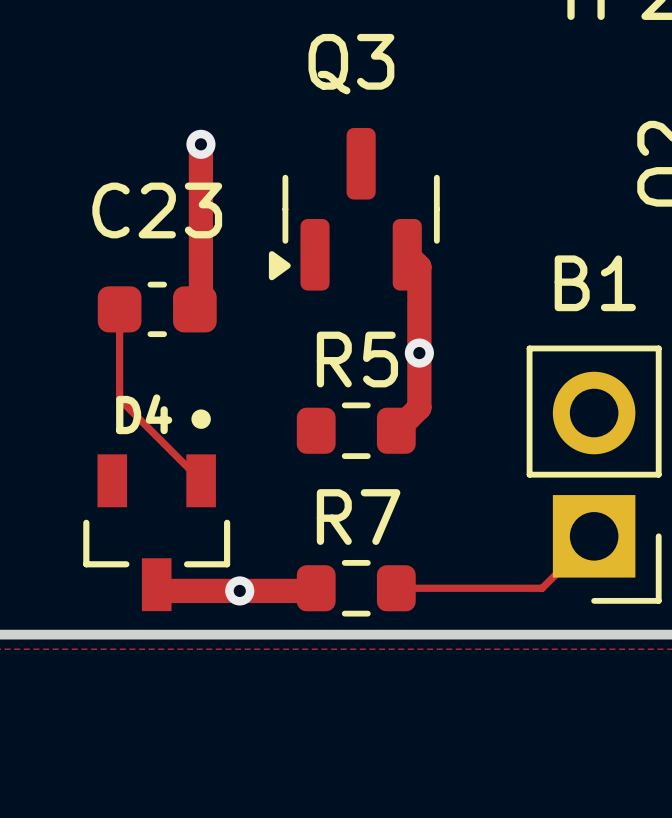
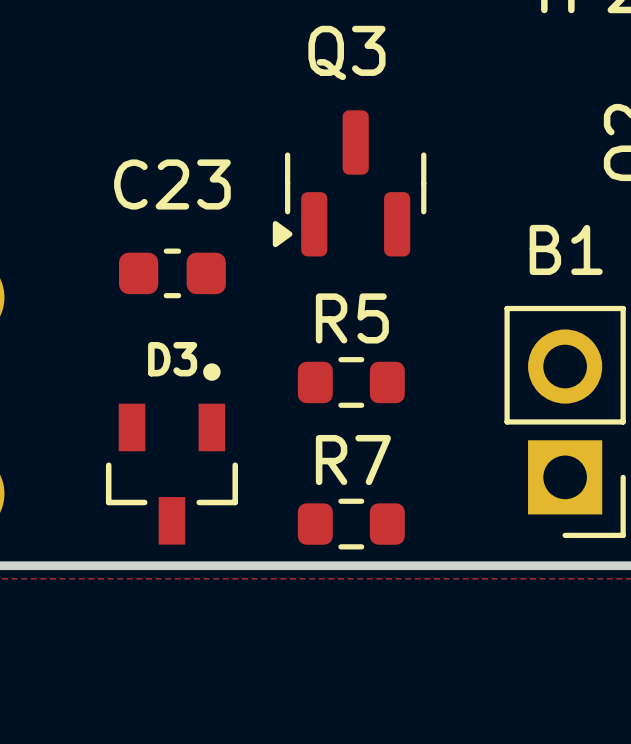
track: (200, 144) (200, 303) (194, 309) -> none
via: (200, 144) -> none
track: (407, 254) (419, 266) (419, 407) (396, 430) -> none
track: (119, 309) (119, 399) (201, 480) -> none
via: (419, 353) -> none
D4 name: D4 (144, 414) -> D3 (172, 359)
track: (594, 536) (542, 588) (396, 588) -> none
track: (156, 584) (162, 590) (230, 590) -> none
track: (316, 588) (313, 590) (239, 590) -> none
via: (239, 590) -> none

